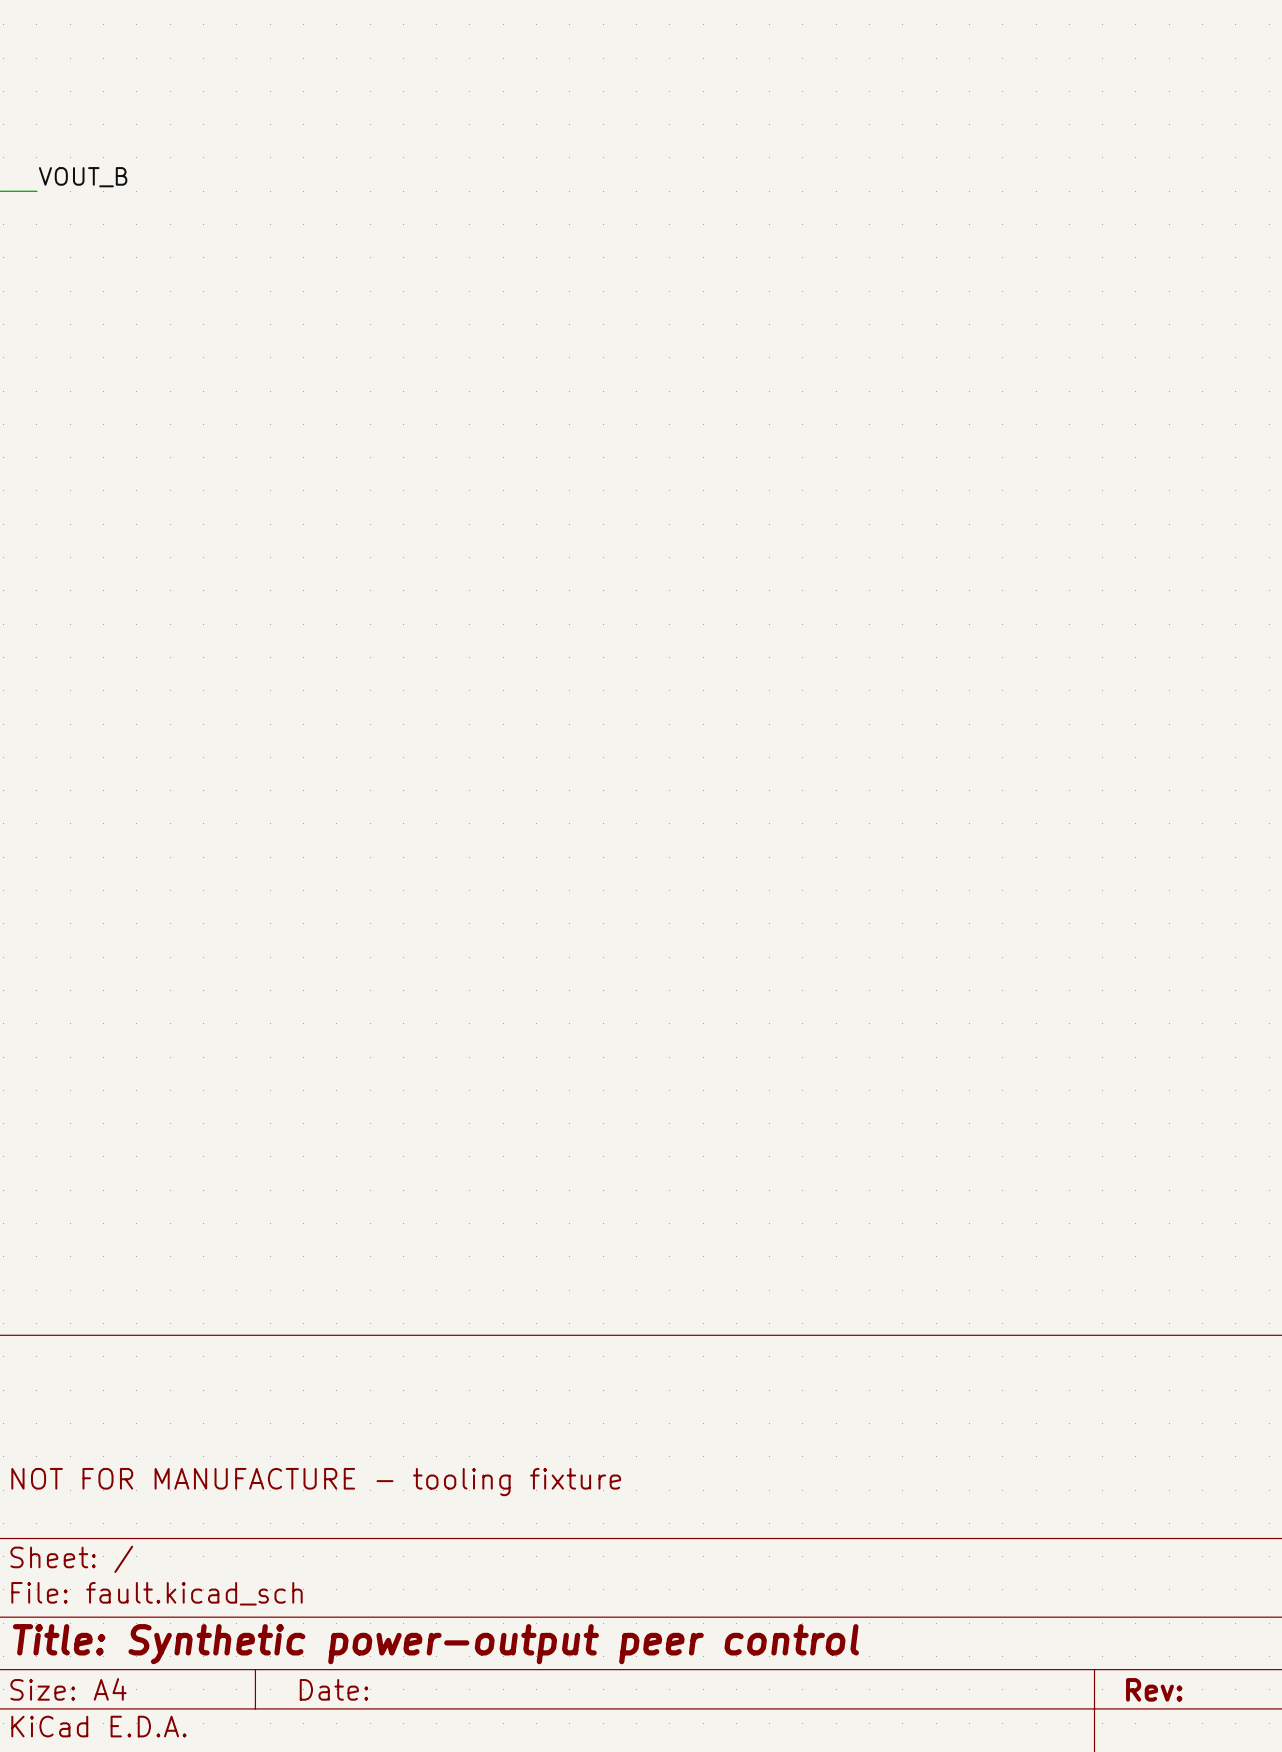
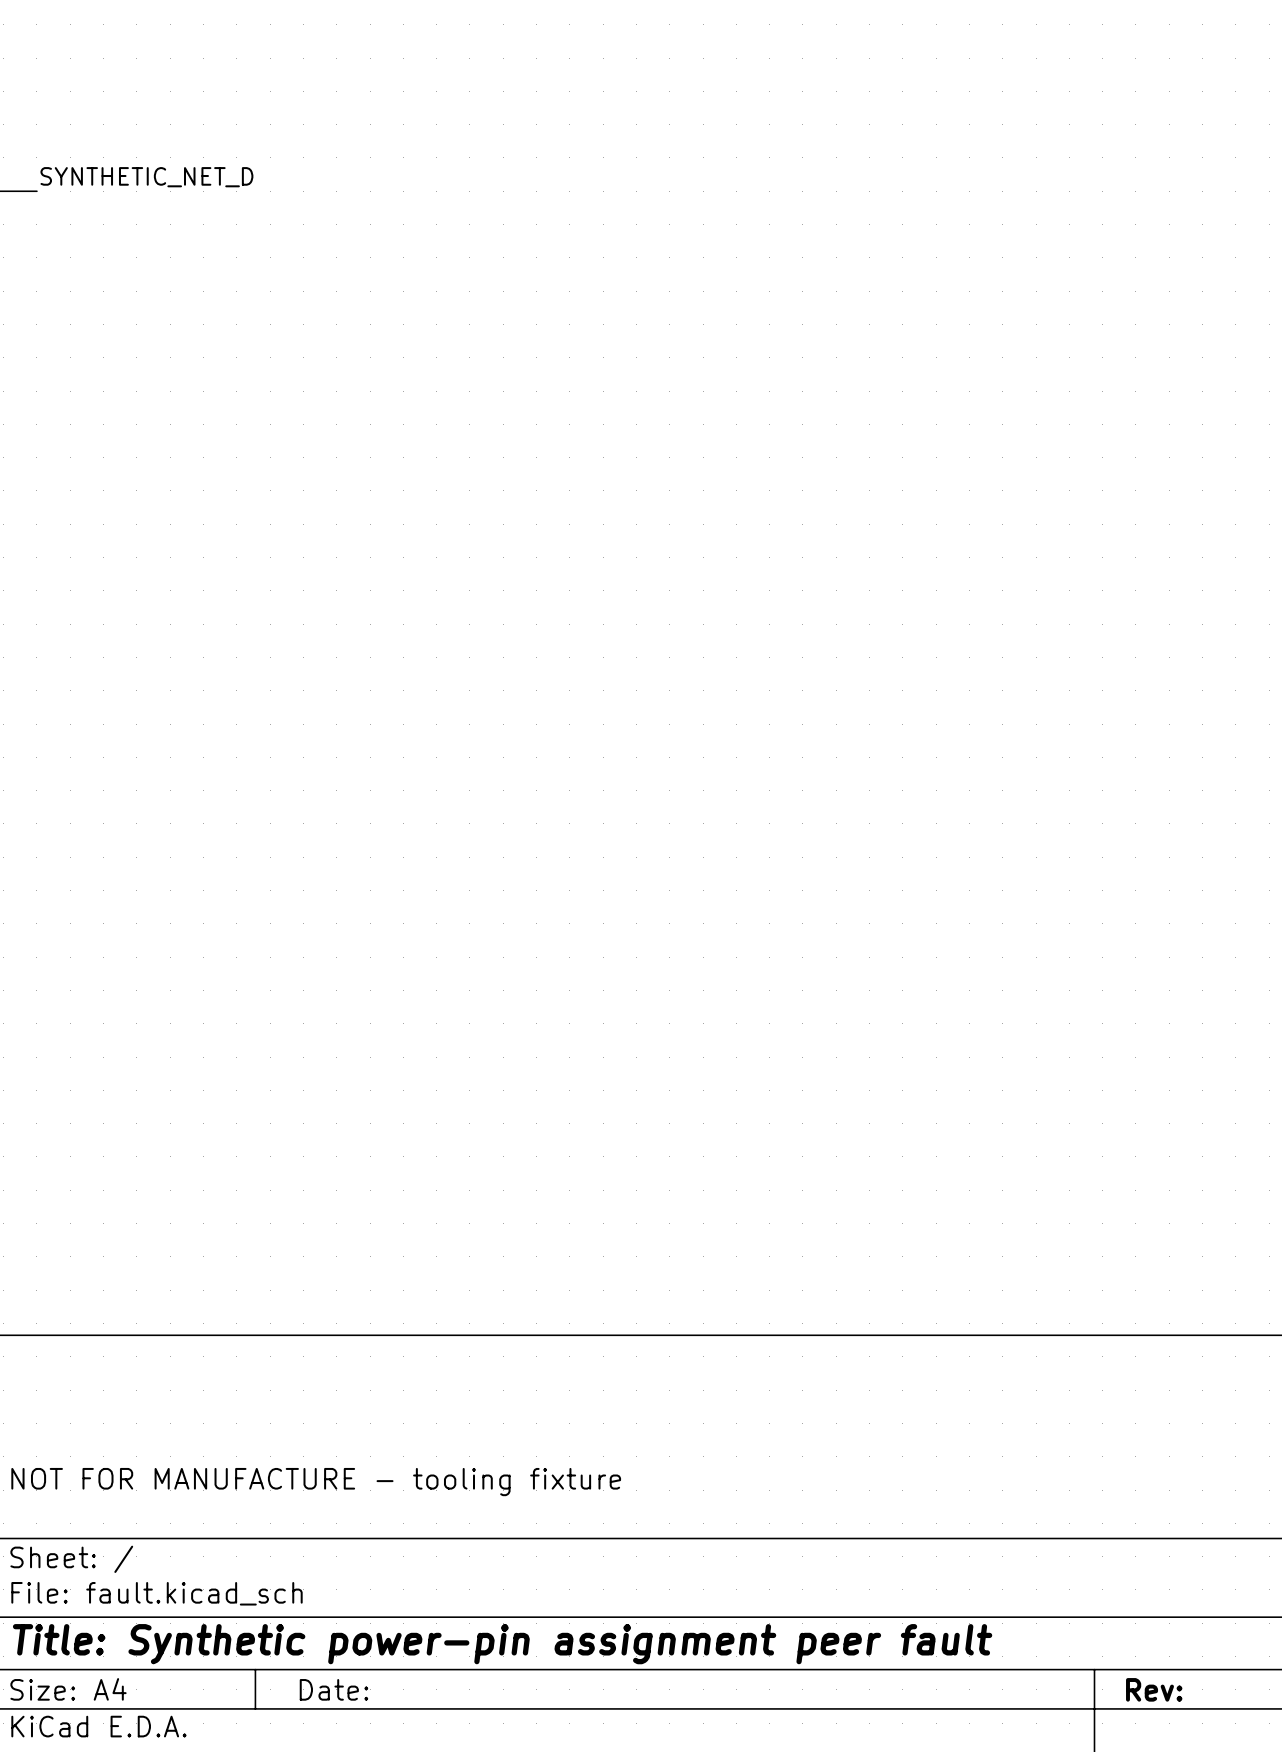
label: VOUT_B (83, 177) -> SYNTHETIC_NET_D (146, 177)
title block: Title: Synthetic power-output peer control (435, 1644) -> Title: Synthetic power-pin assignment peer fault (502, 1644)

